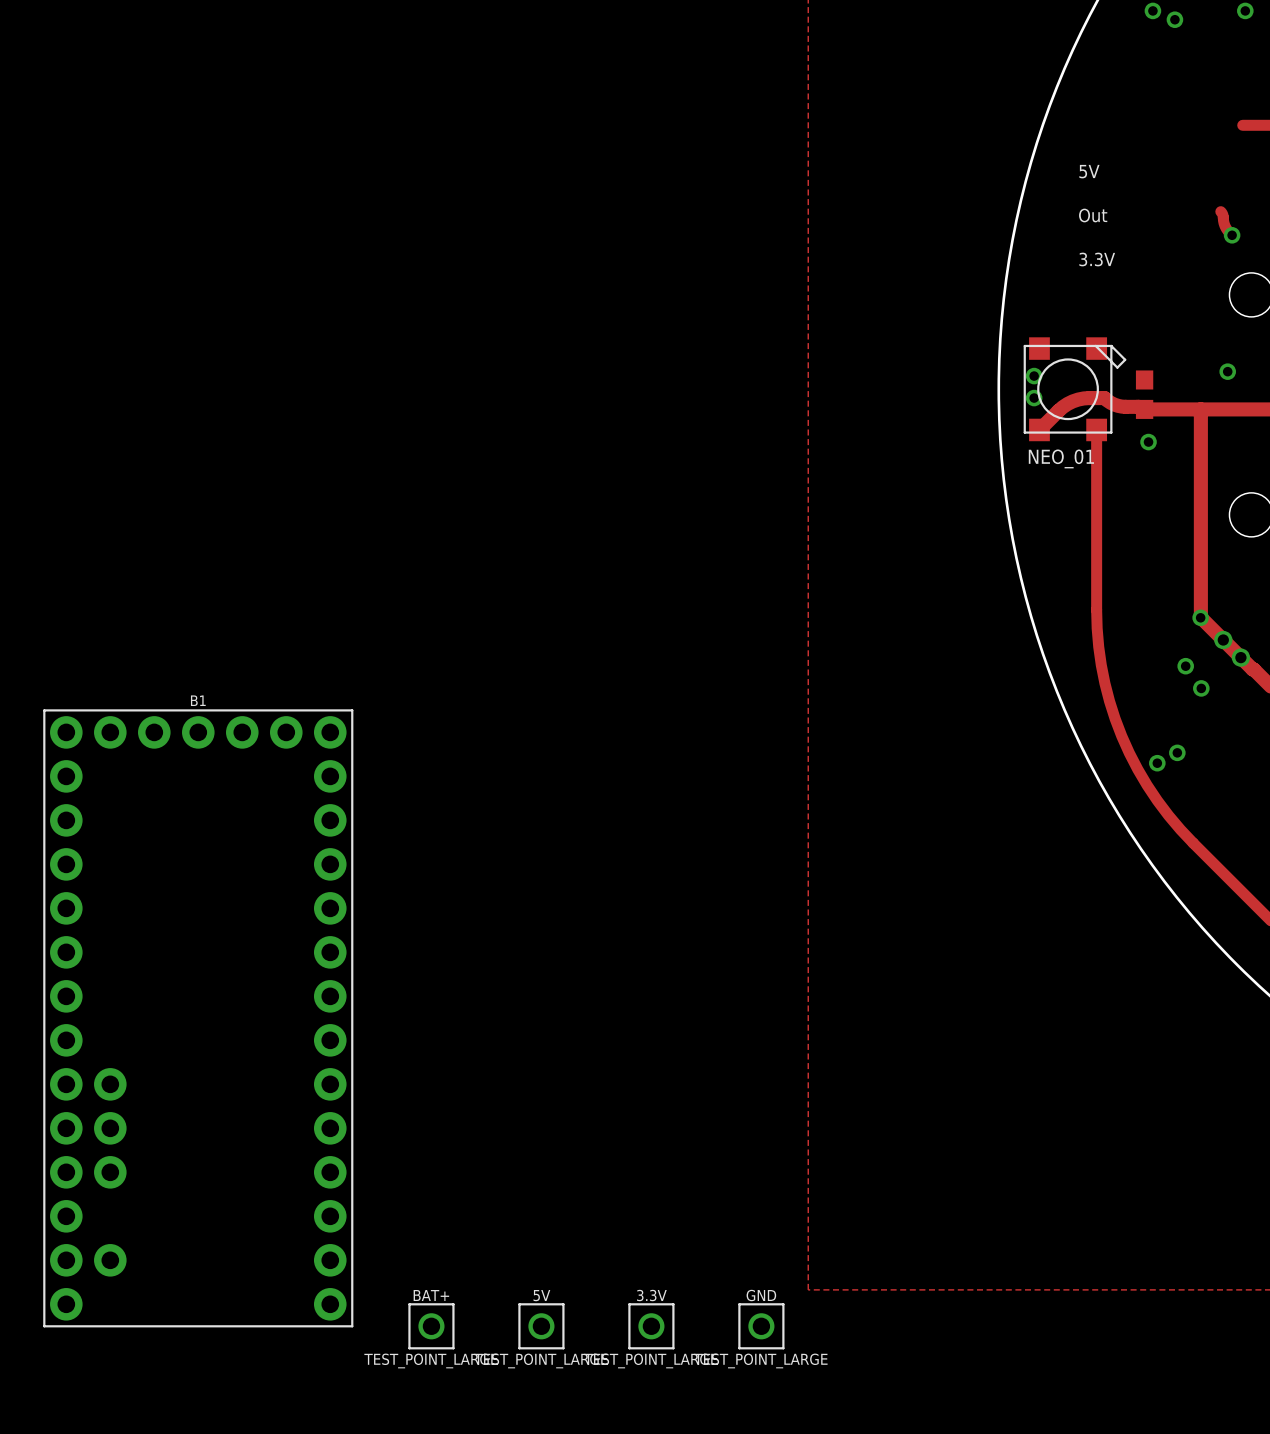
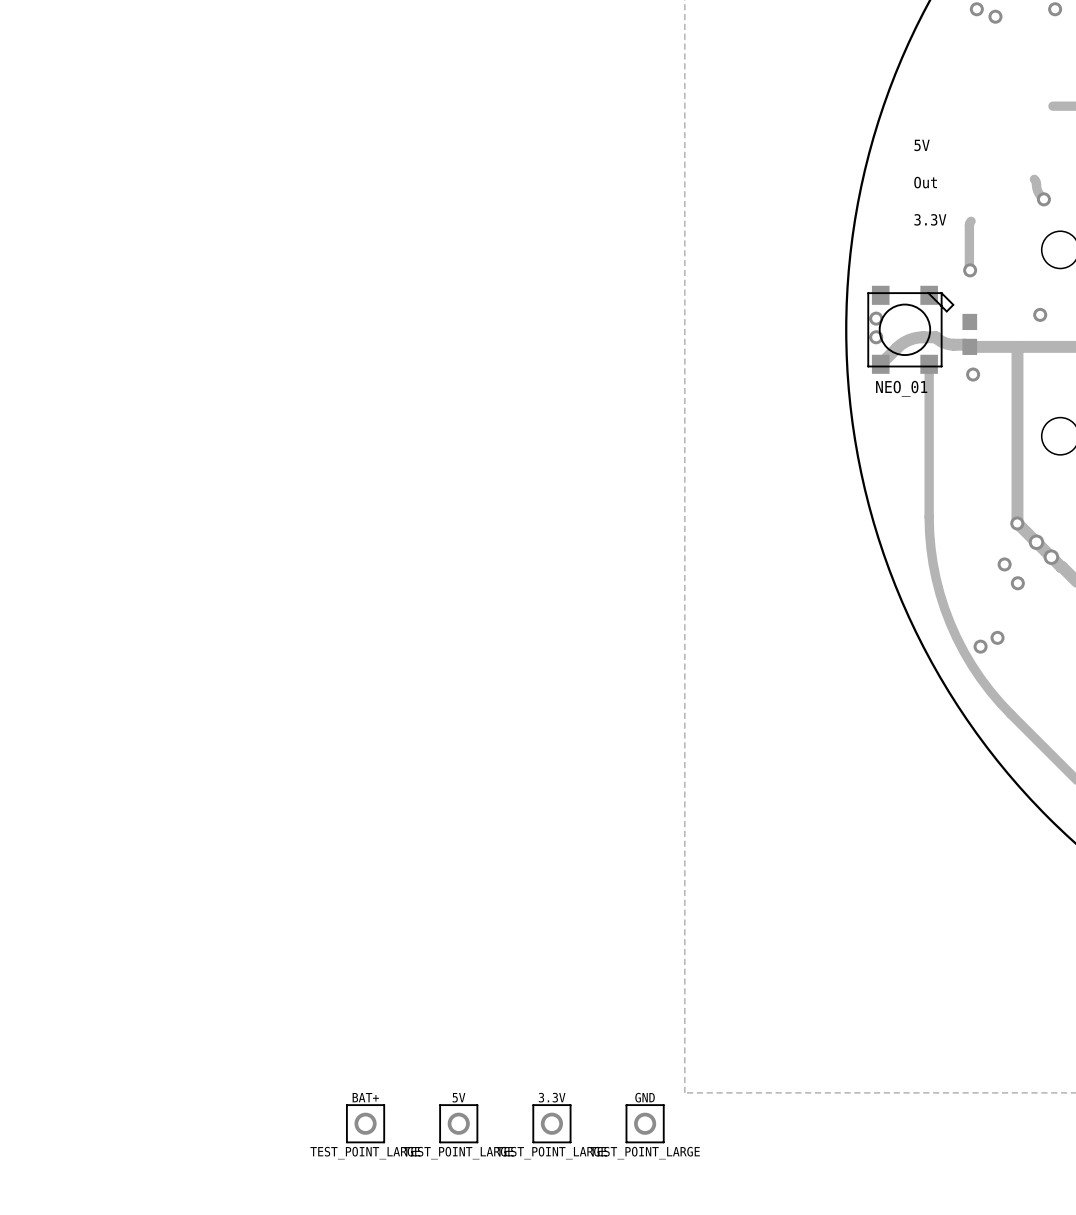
track: none -> (971, 221) (969, 225) (970, 270)
via: none -> (970, 270)
B1: (198, 1018) -> none

